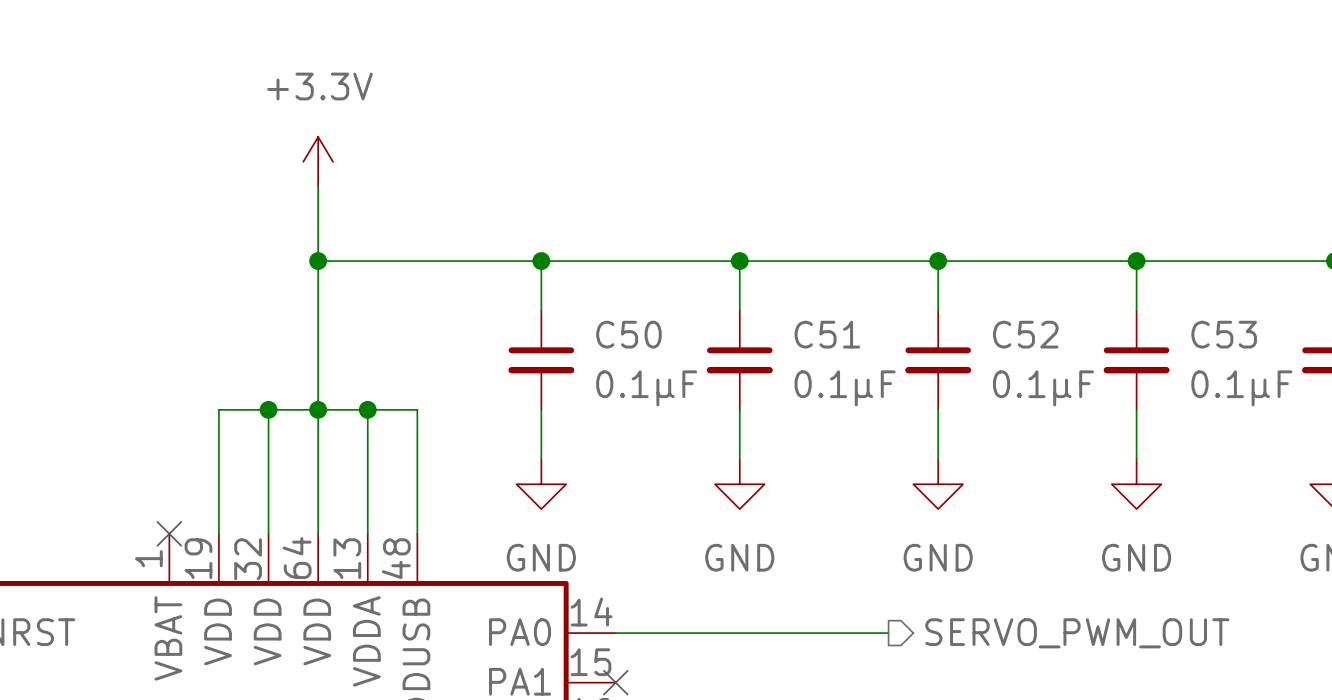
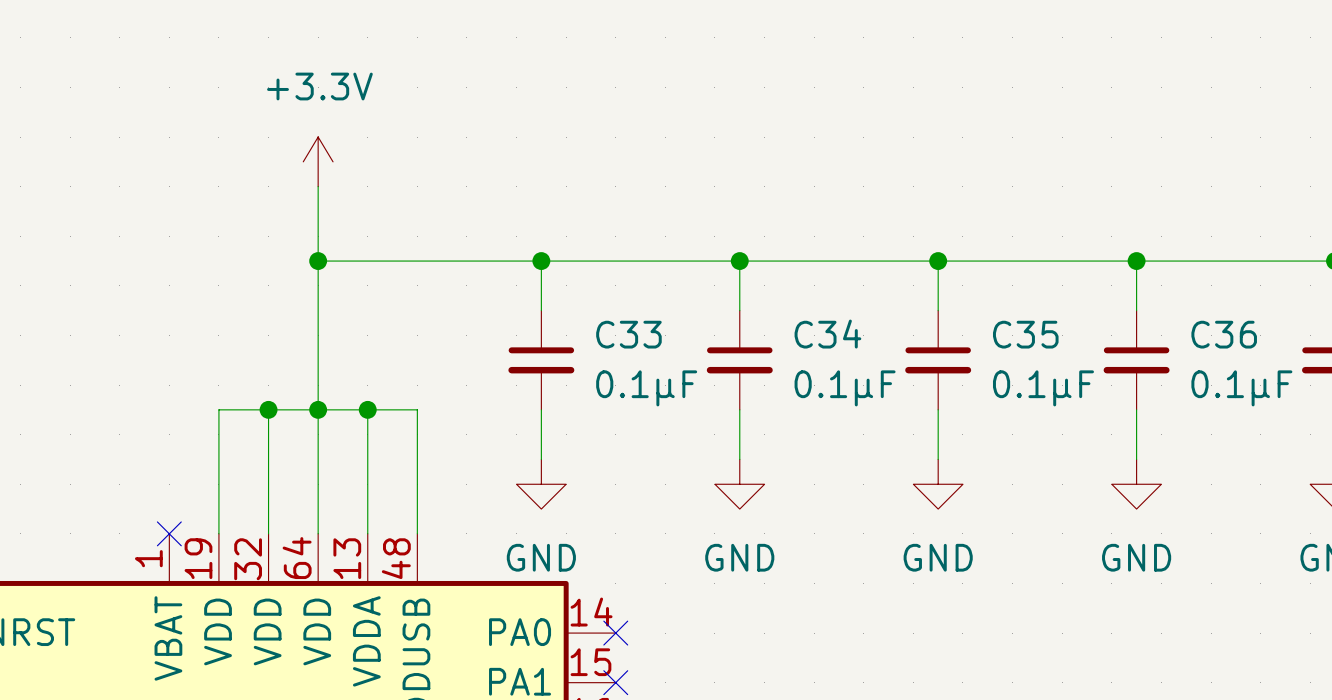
C50 name: C50 (628, 334) -> C33 (628, 334)
C51 name: C51 (827, 334) -> C34 (827, 334)
C52 name: C52 (1025, 334) -> C35 (1025, 334)
C53 name: C53 (1224, 334) -> C36 (1224, 334)
wire: (615, 633) (888, 633) -> none
no-connect mark: none -> (615, 633)
hierarchical label: SERVO_PWM_OUT (1077, 633) -> none

